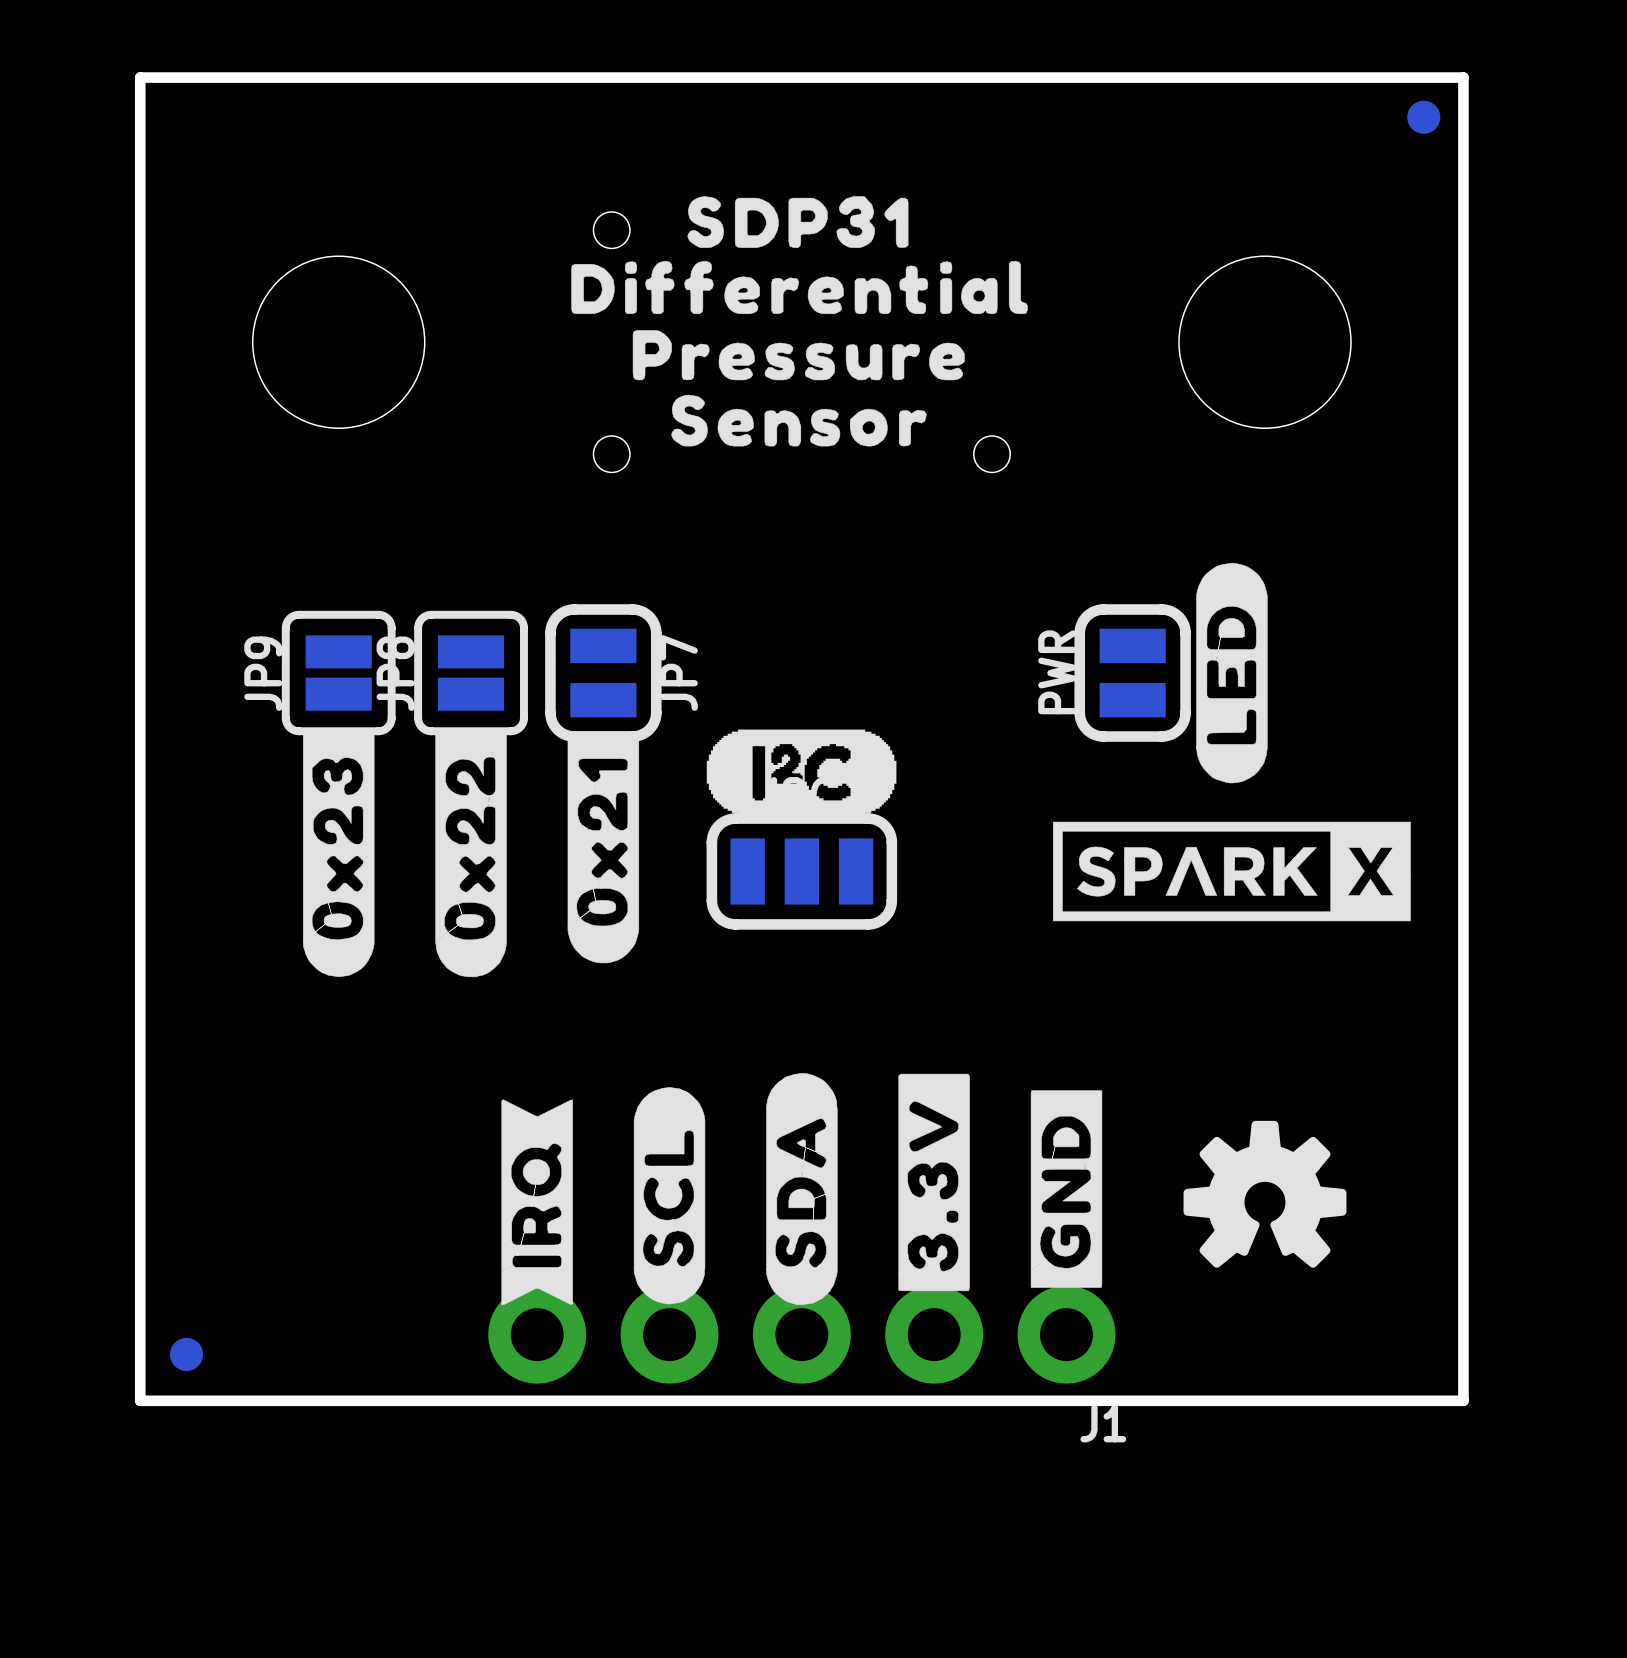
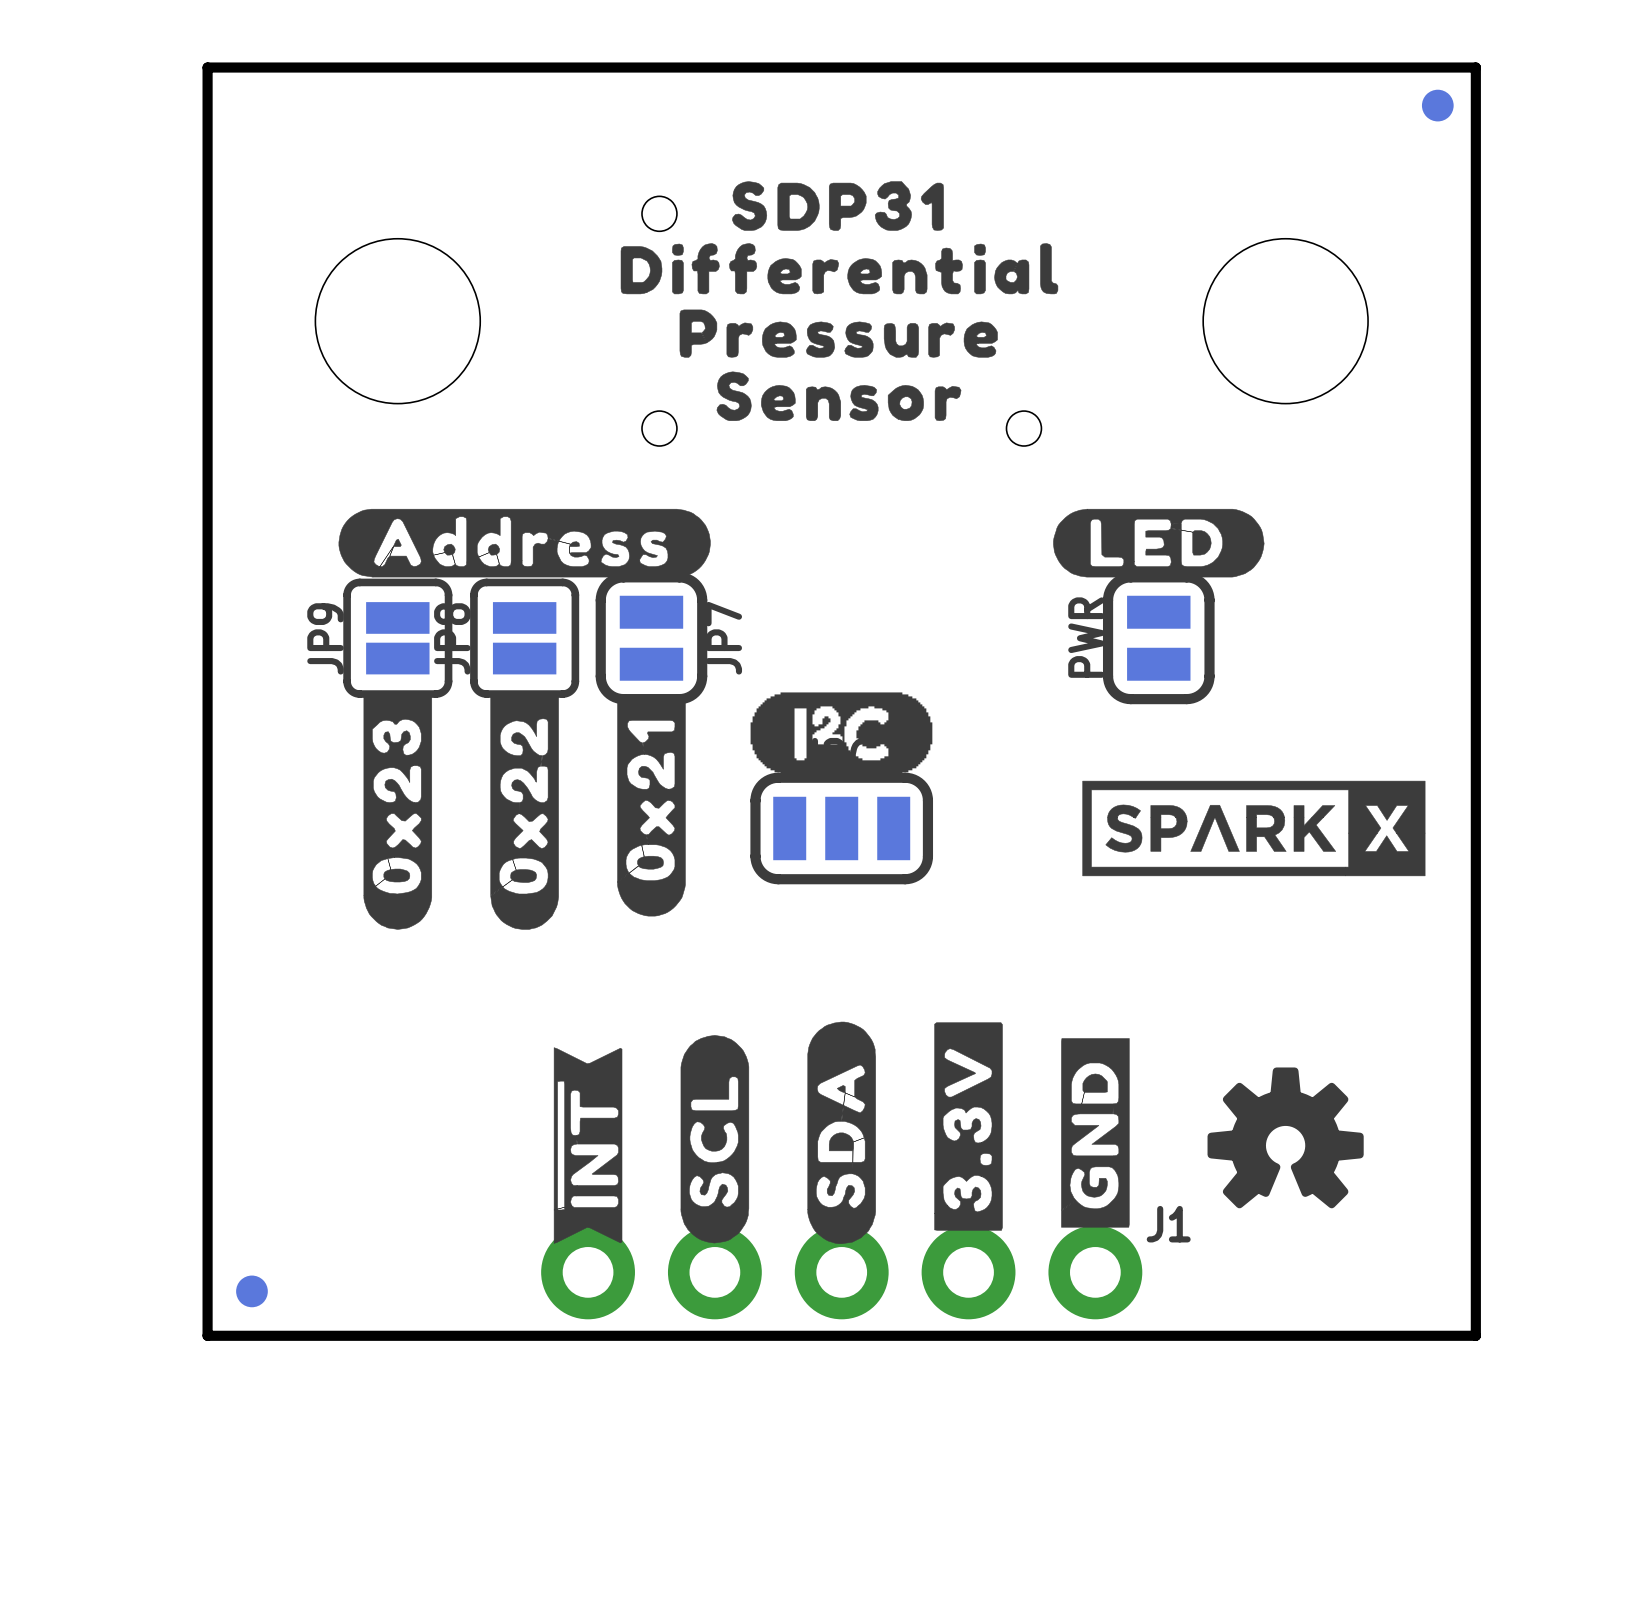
drawing: none -> [338, 508, 711, 578]
drawing: none -> [1053, 508, 1265, 578]
drawing: [1196, 562, 1268, 784] -> none
drawing shape: [501, 1099, 573, 1306] -> [553, 1047, 623, 1244]
J1 name position: J1 (1103, 1423) -> J1 (1168, 1224)

